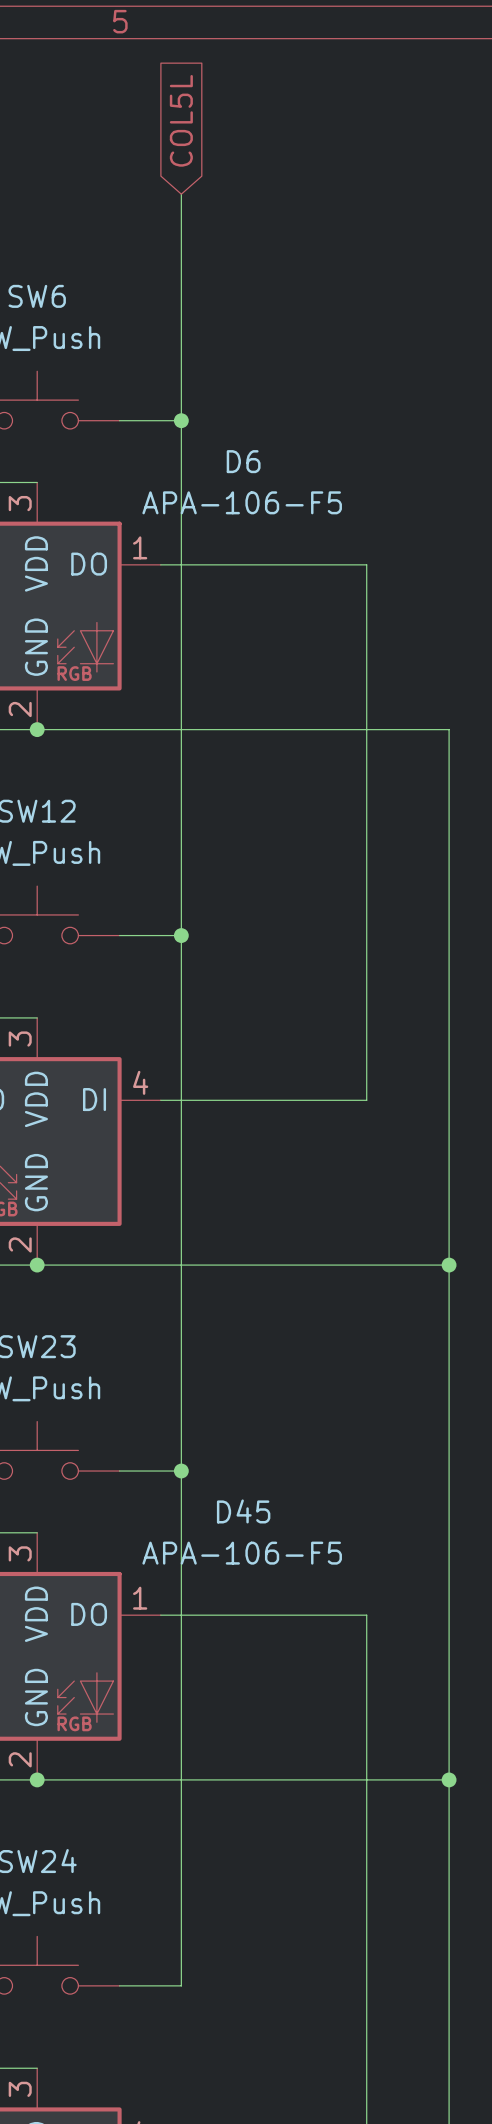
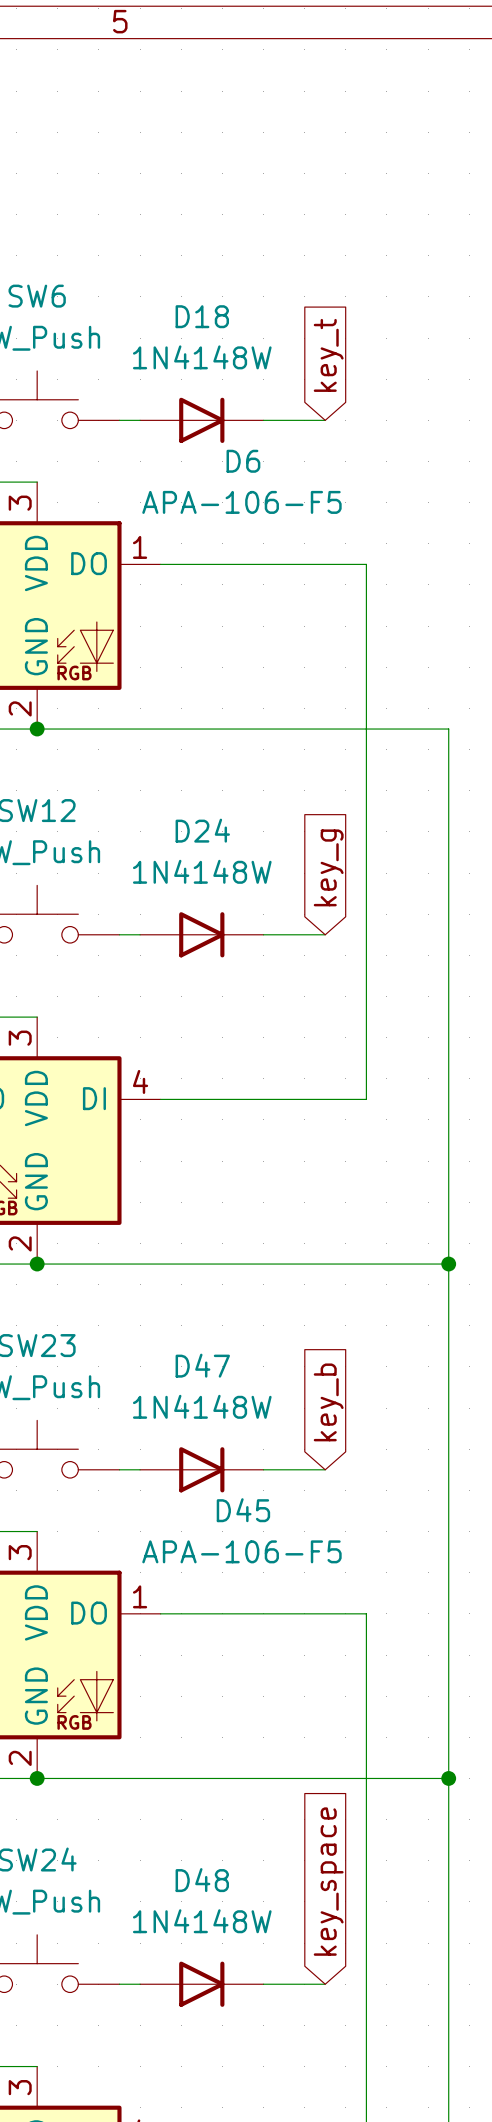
global label: COL5L (181, 120) -> none
wire: (181, 194) (181, 1985) (140, 1985) -> none
global label: none -> key_t (328, 355)
junction: (181, 420) -> none
D18: none -> 1N4148W (201, 420)
wire: none -> (263, 420) (325, 420)
global label: none -> key_g (328, 867)
junction: (181, 935) -> none
D24: none -> 1N4148W (201, 934)
wire: none -> (263, 934) (325, 934)
global label: none -> key_b (328, 1402)
junction: (181, 1471) -> none
D47: none -> 1N4148W (201, 1469)
wire: none -> (263, 1469) (325, 1469)
global label: none -> key_space (328, 1881)
D48: none -> 1N4148W (201, 1984)
wire: none -> (263, 1984) (325, 1984)

